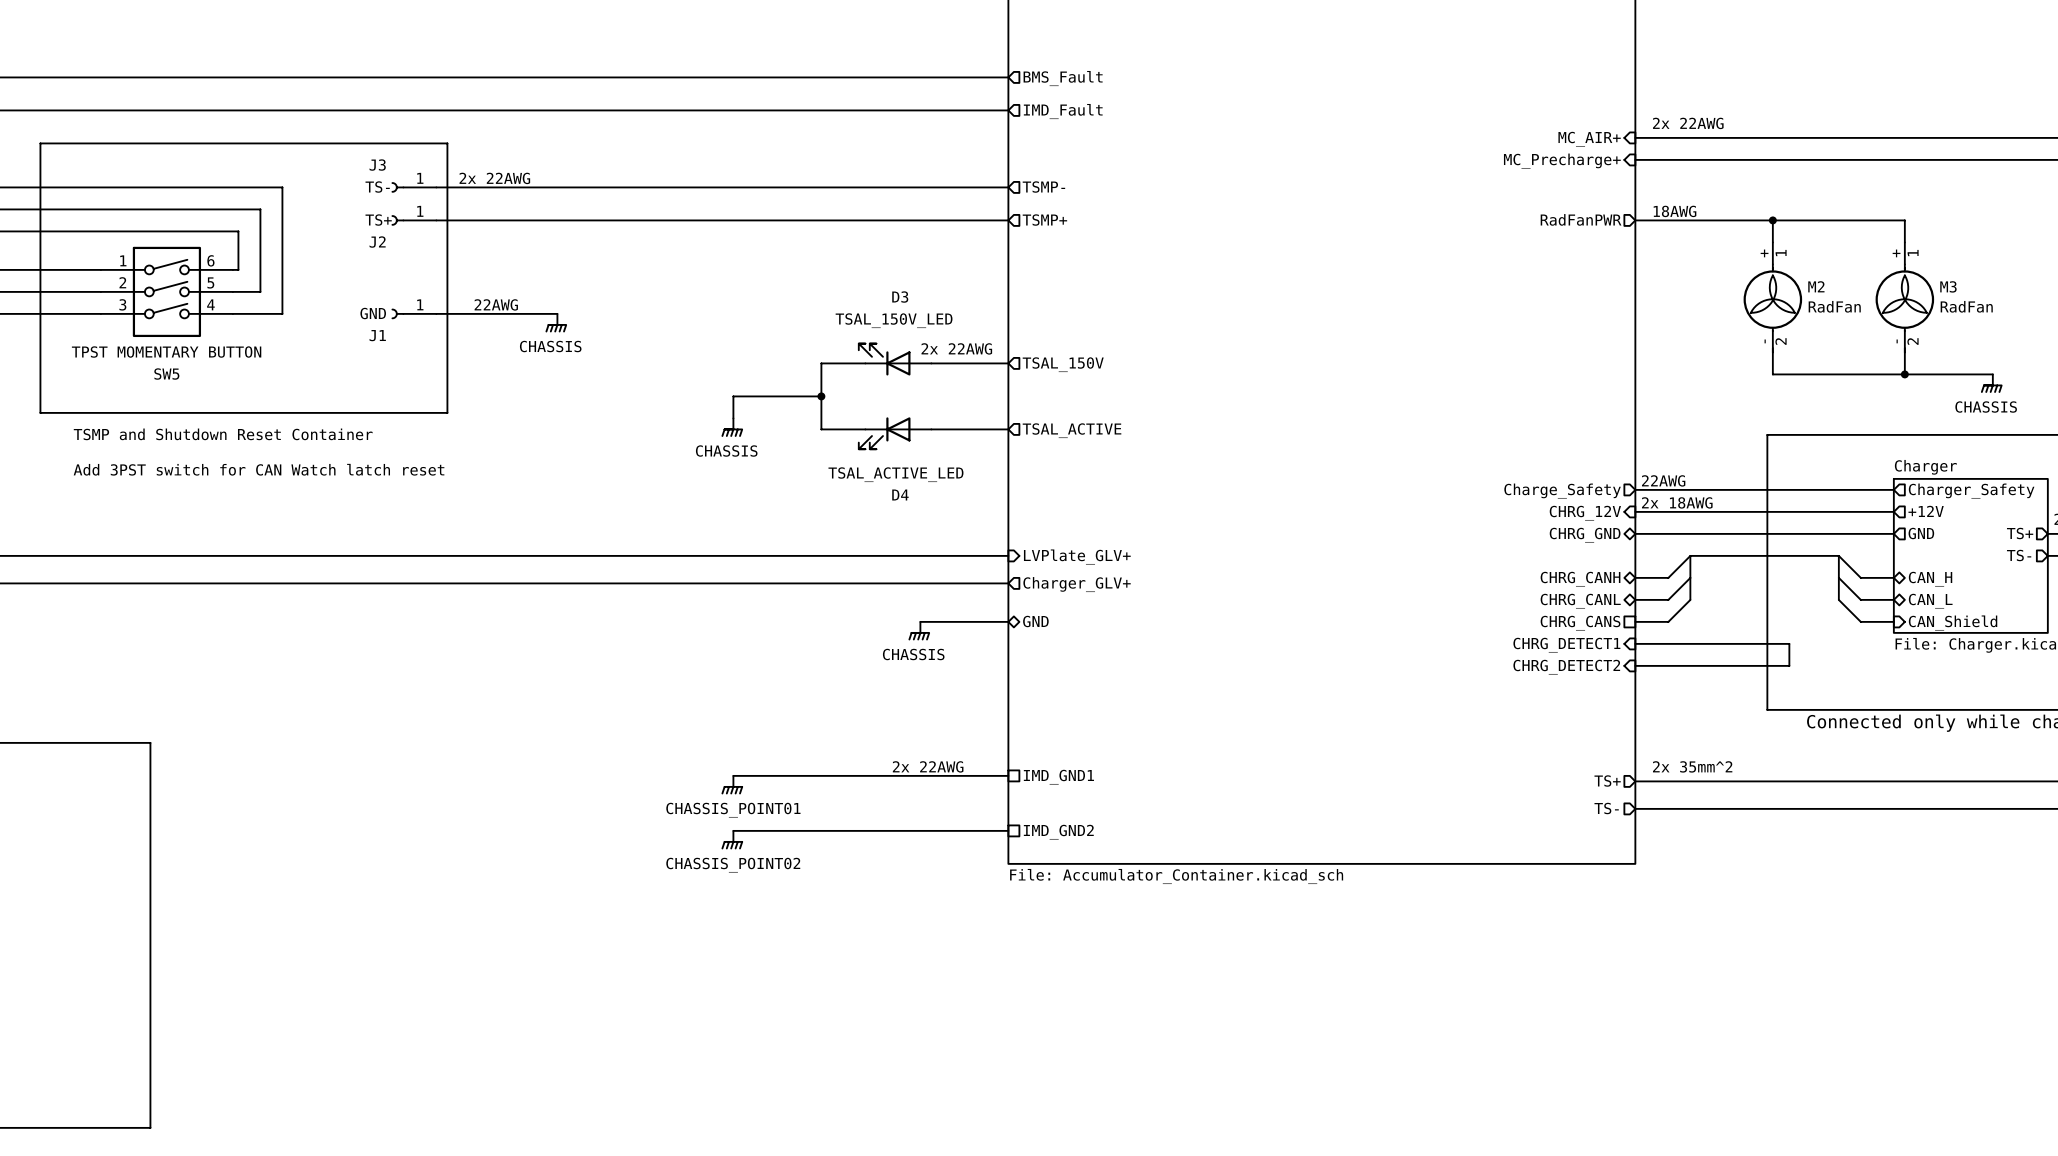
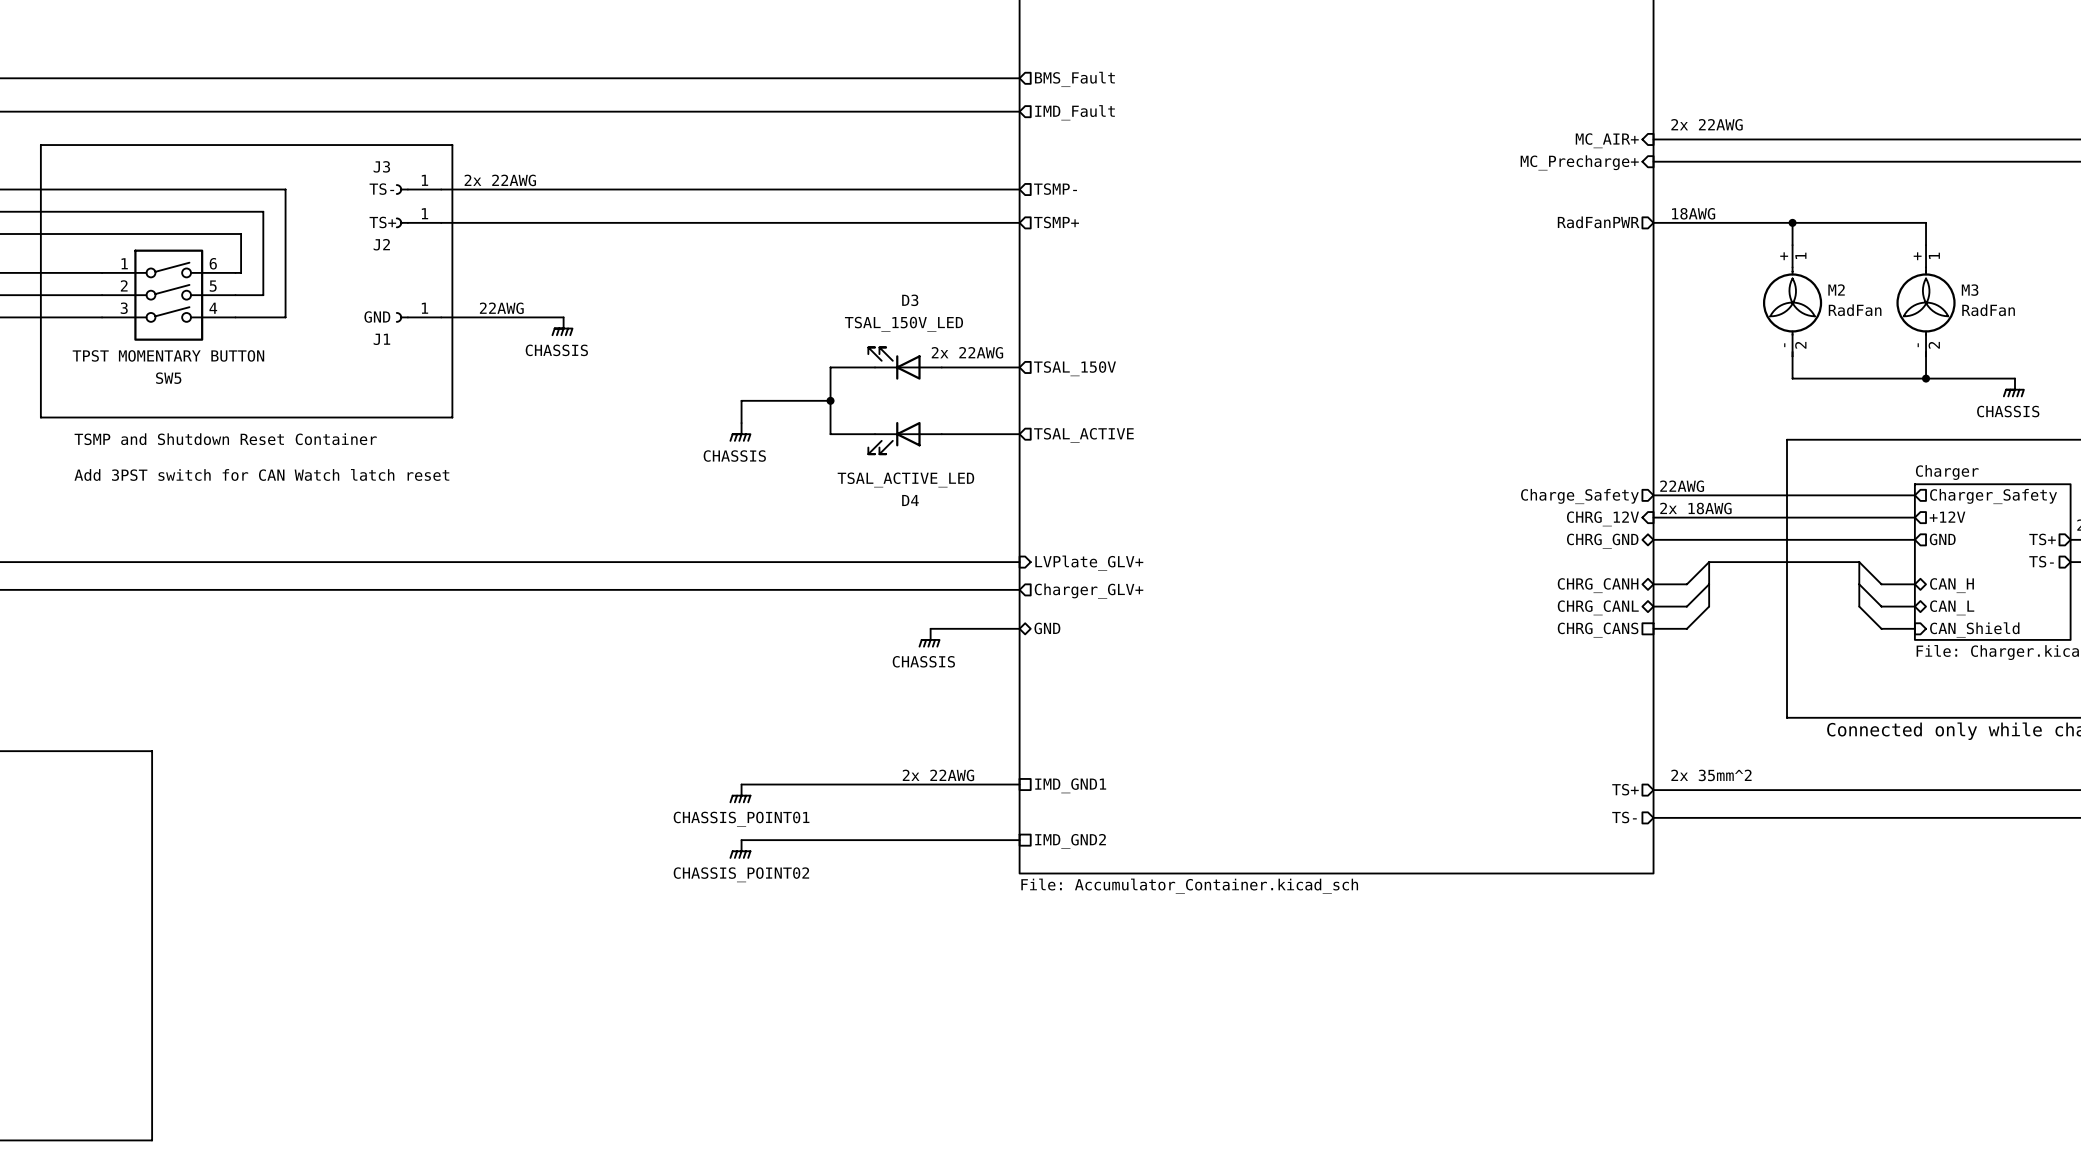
wire: (1635, 643) (1789, 643) (1789, 665) (1635, 665) -> none
sheet pin: CHRG_DETECT1 (1566, 645) -> none
sheet pin: CHRG_DETECT2 (1566, 667) -> none

